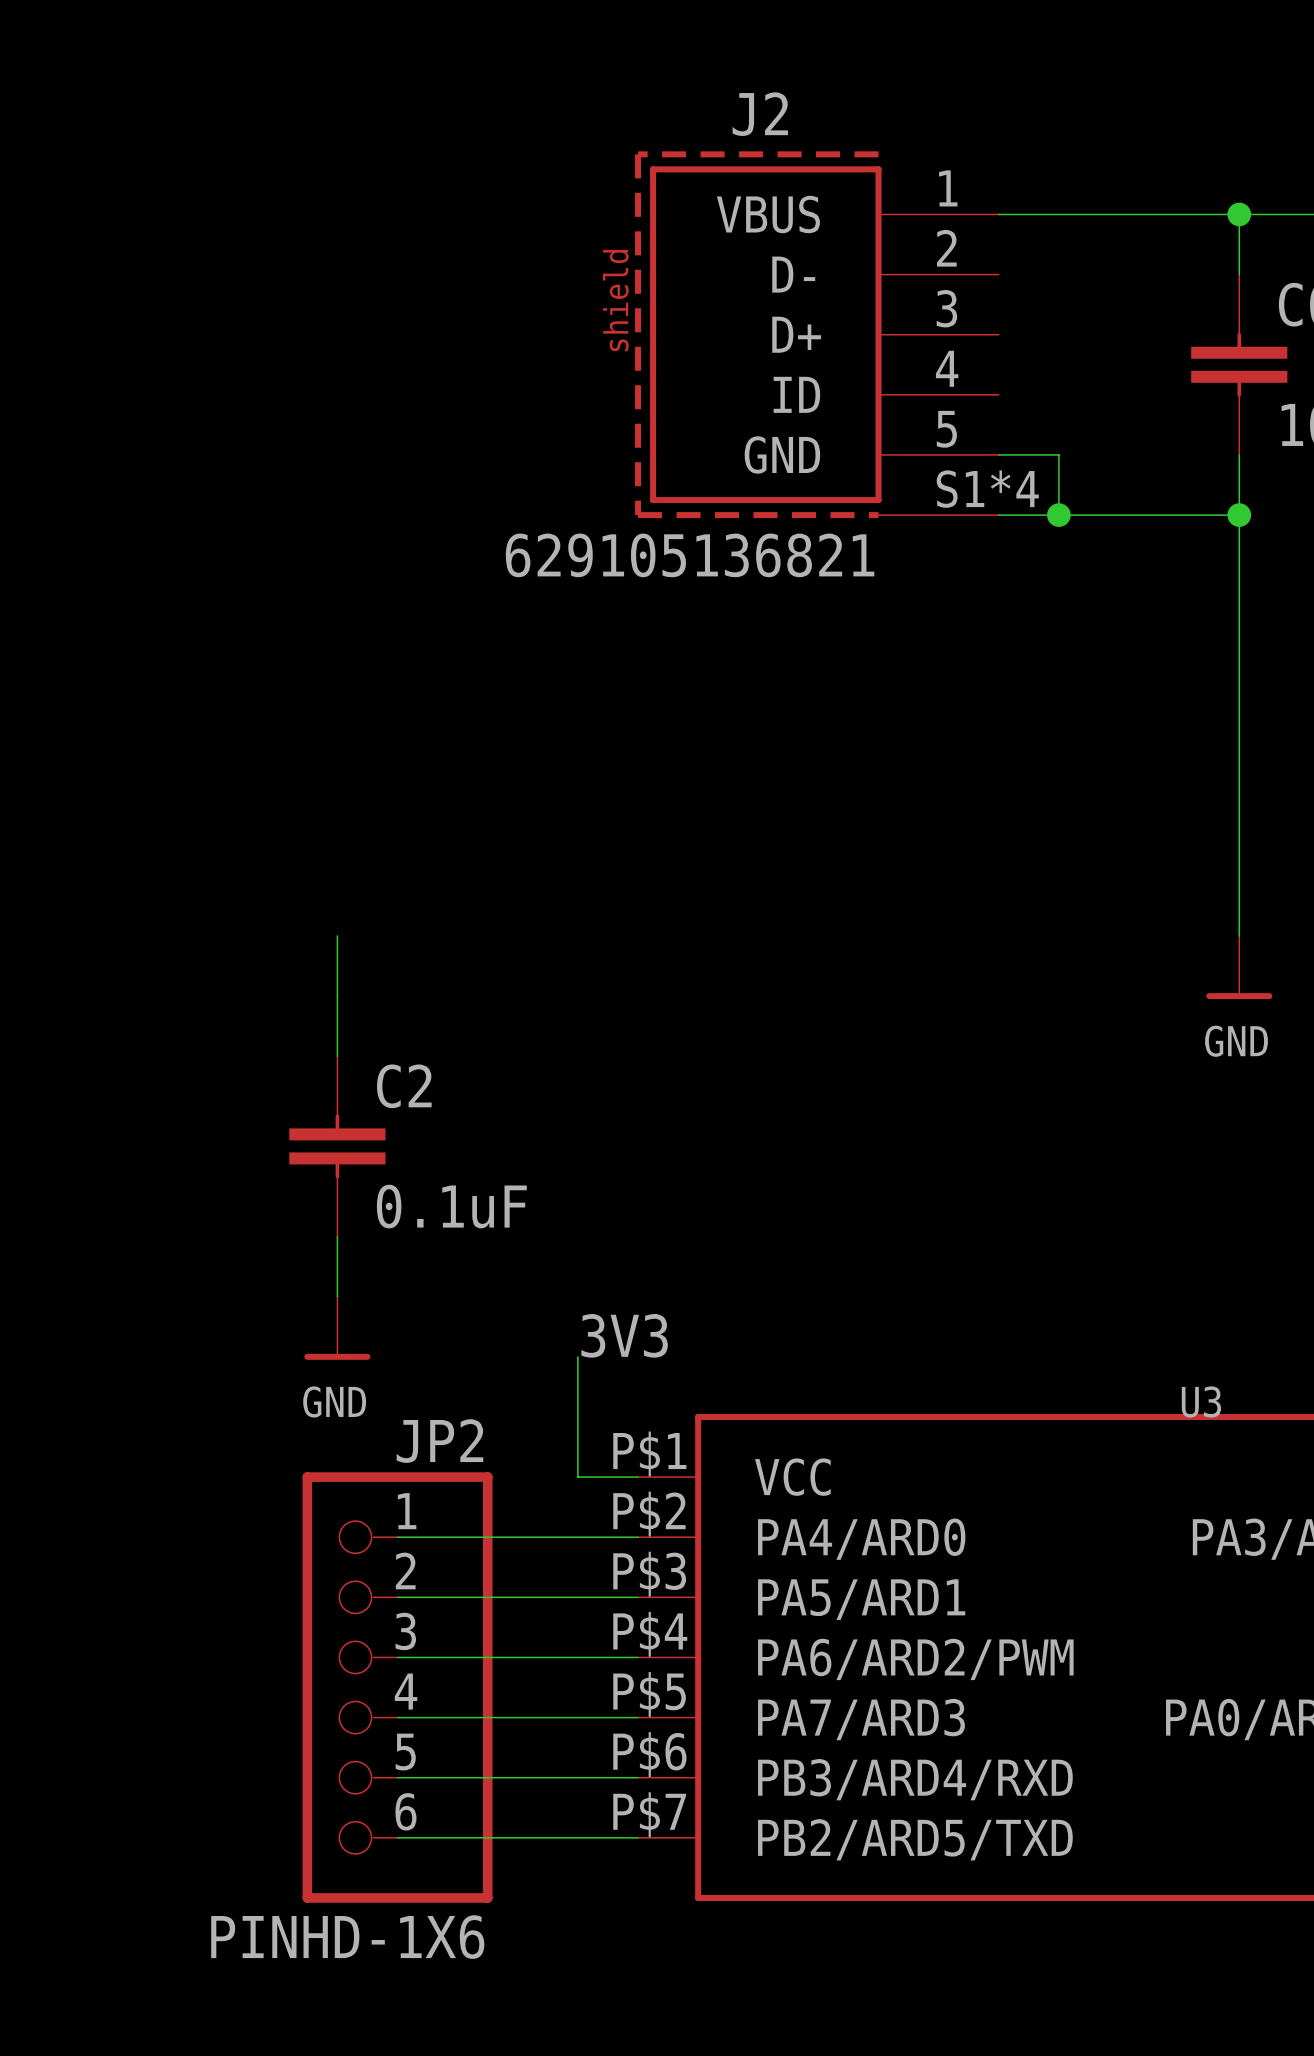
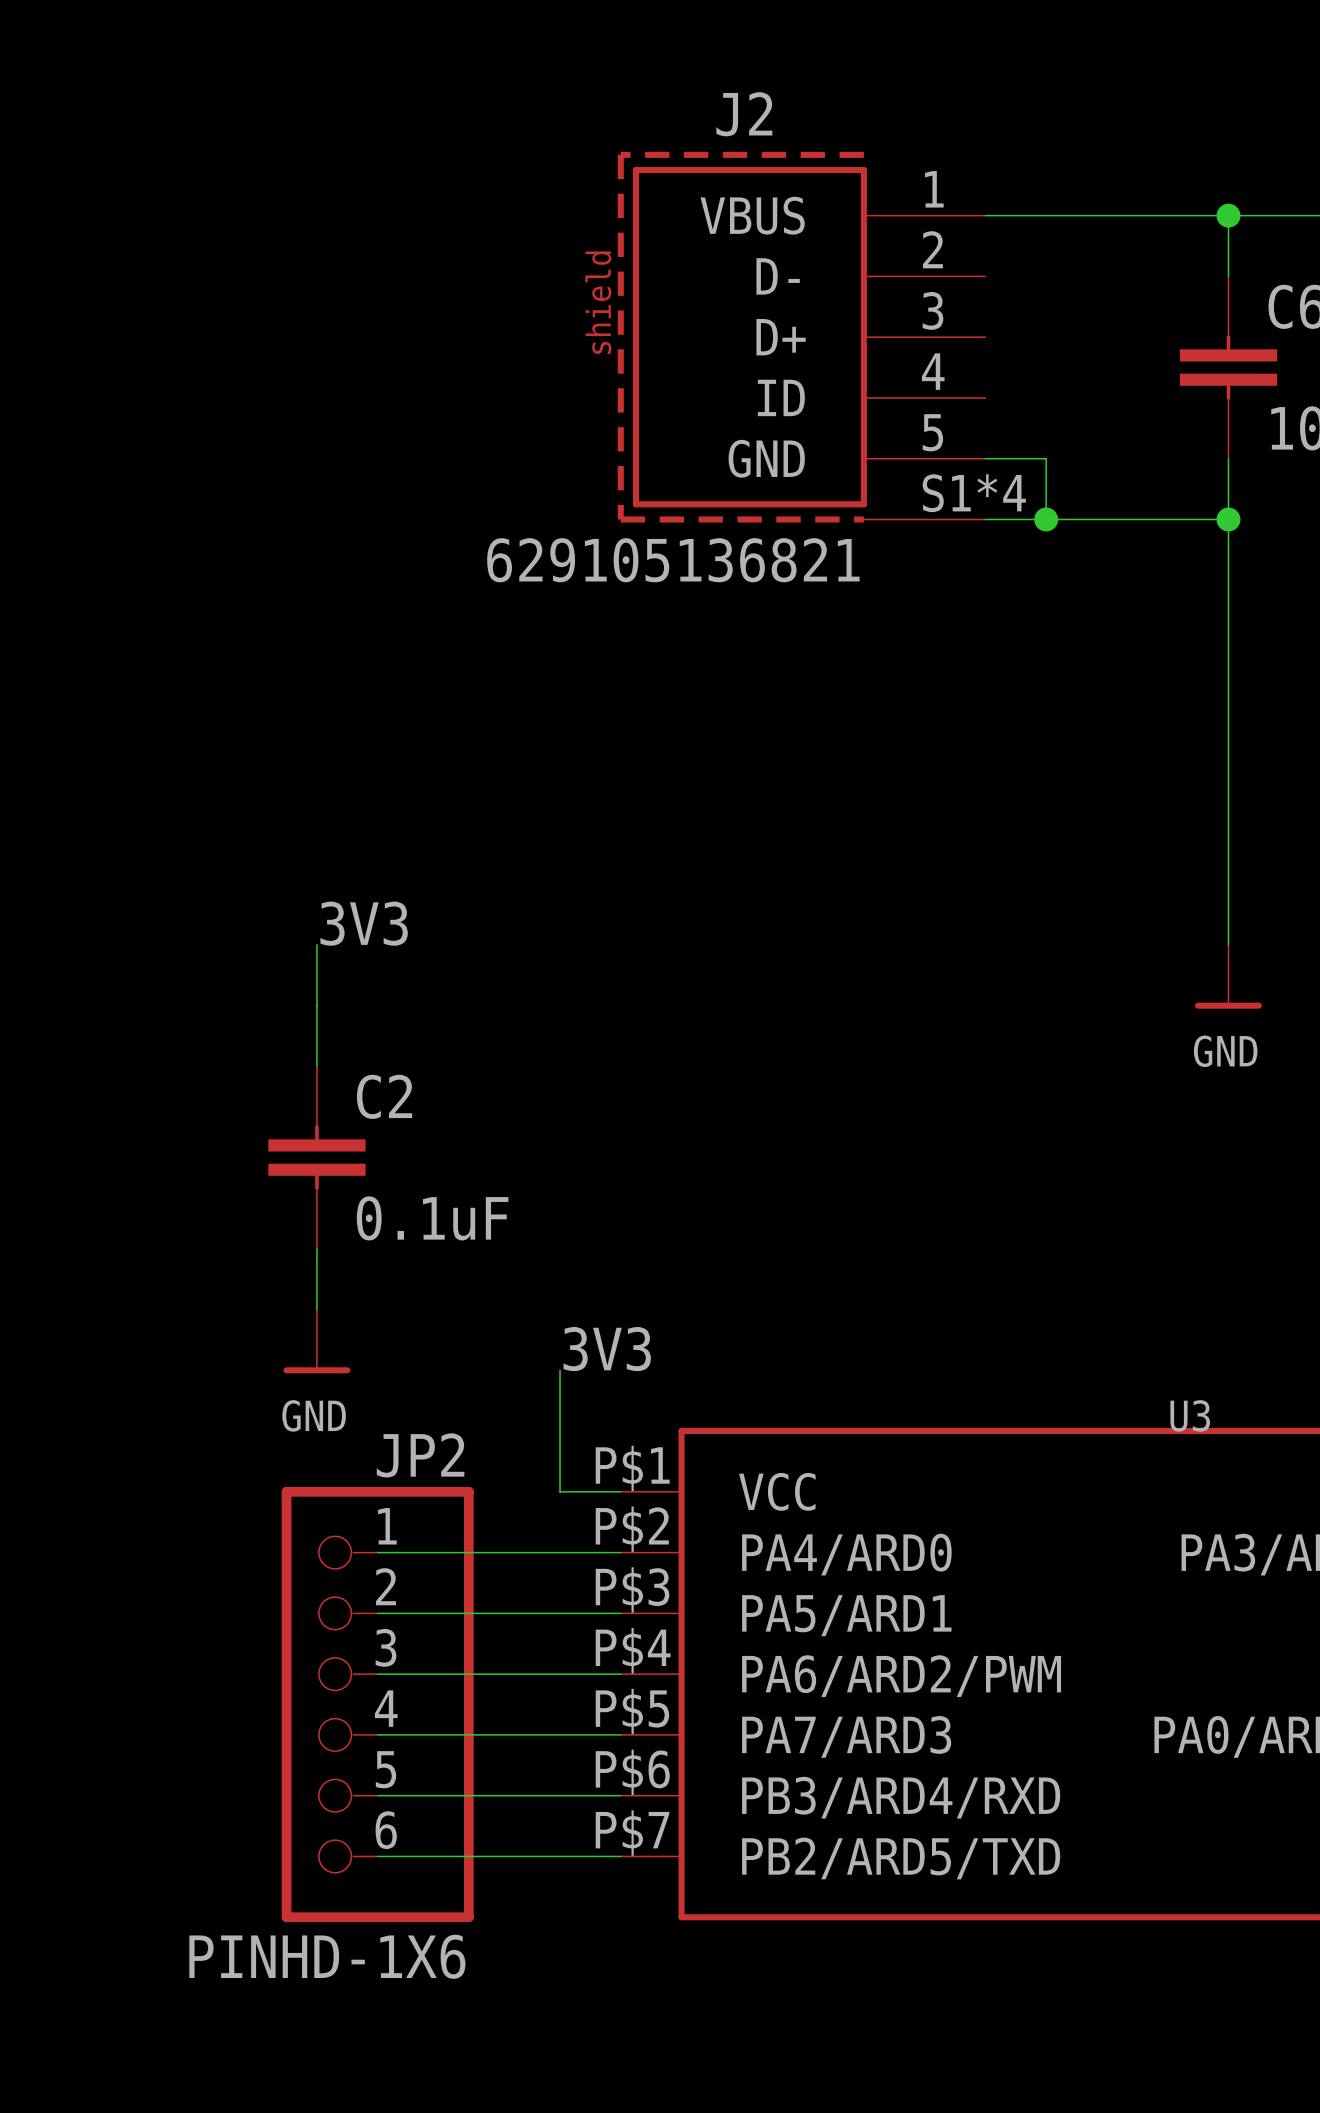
label: none -> 3V3 (364, 923)

